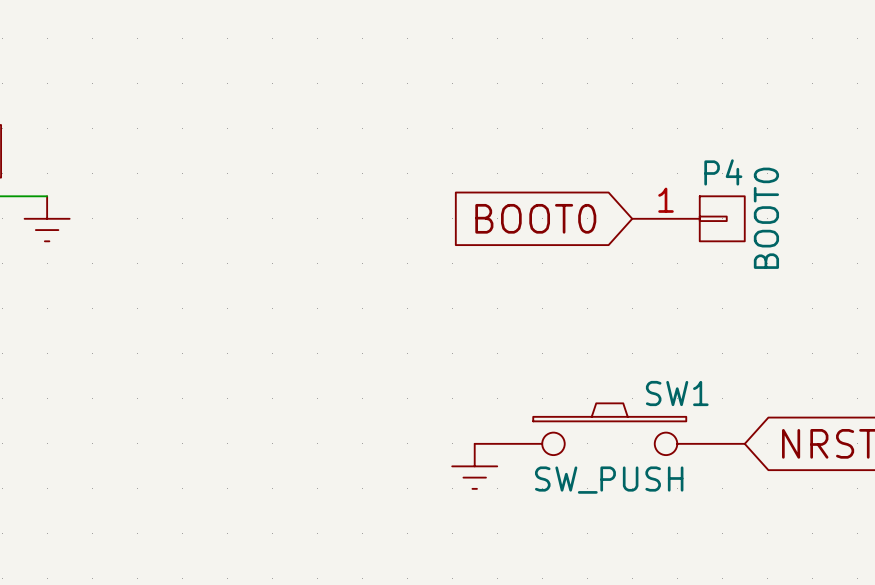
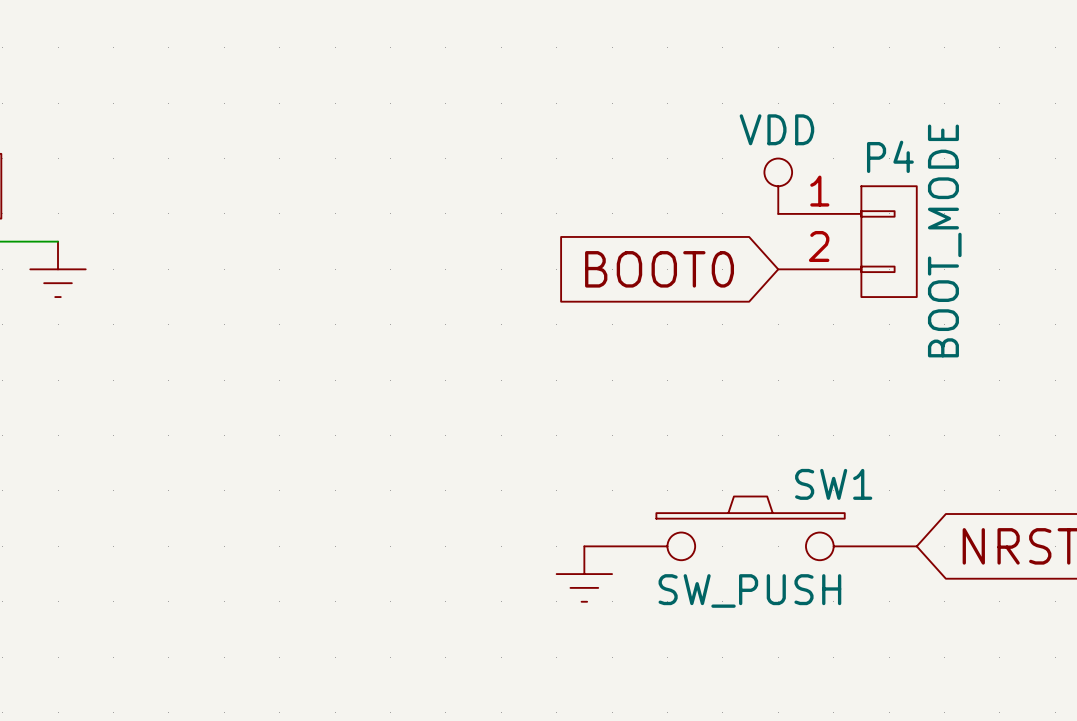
power symbol: none -> VDD (778, 186)
P4 symbol: [632, 196, 745, 242] -> [778, 186, 917, 298]
P4 value: BOOT0 (766, 218) -> BOOT_MODE (944, 240)

